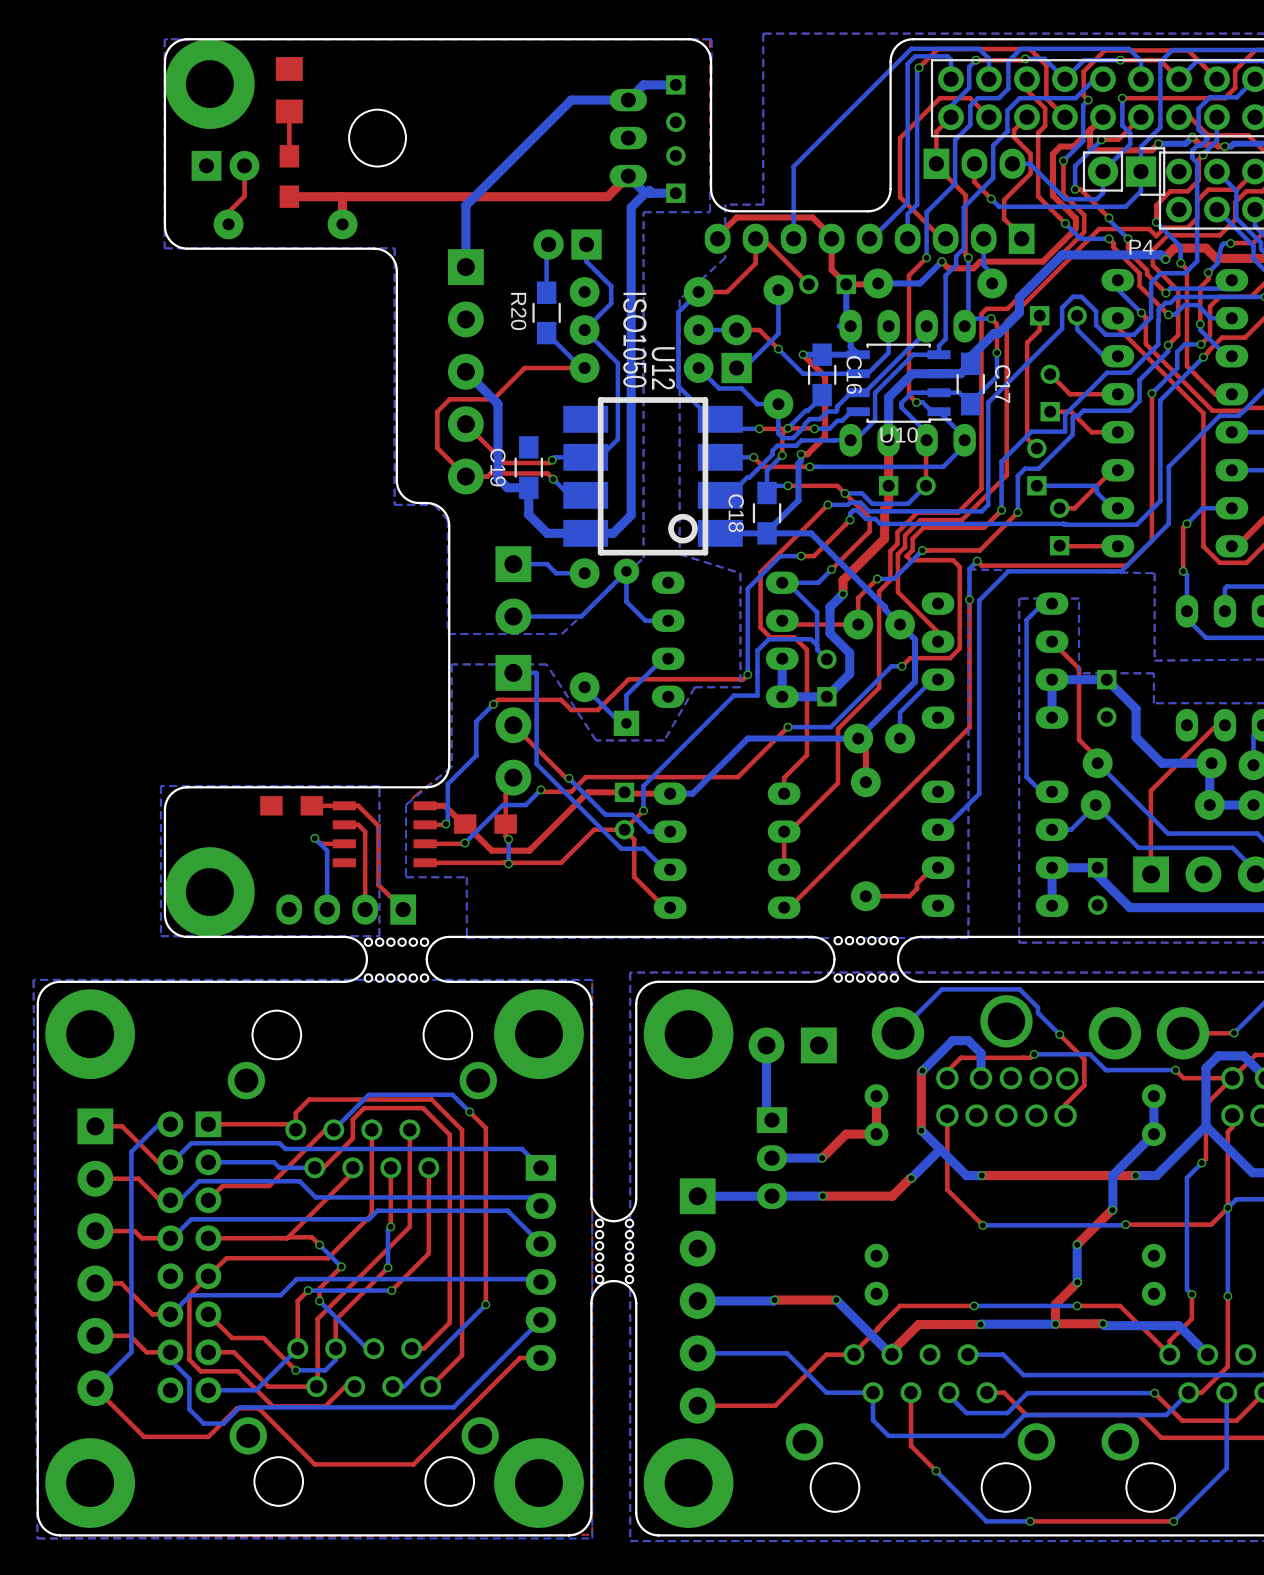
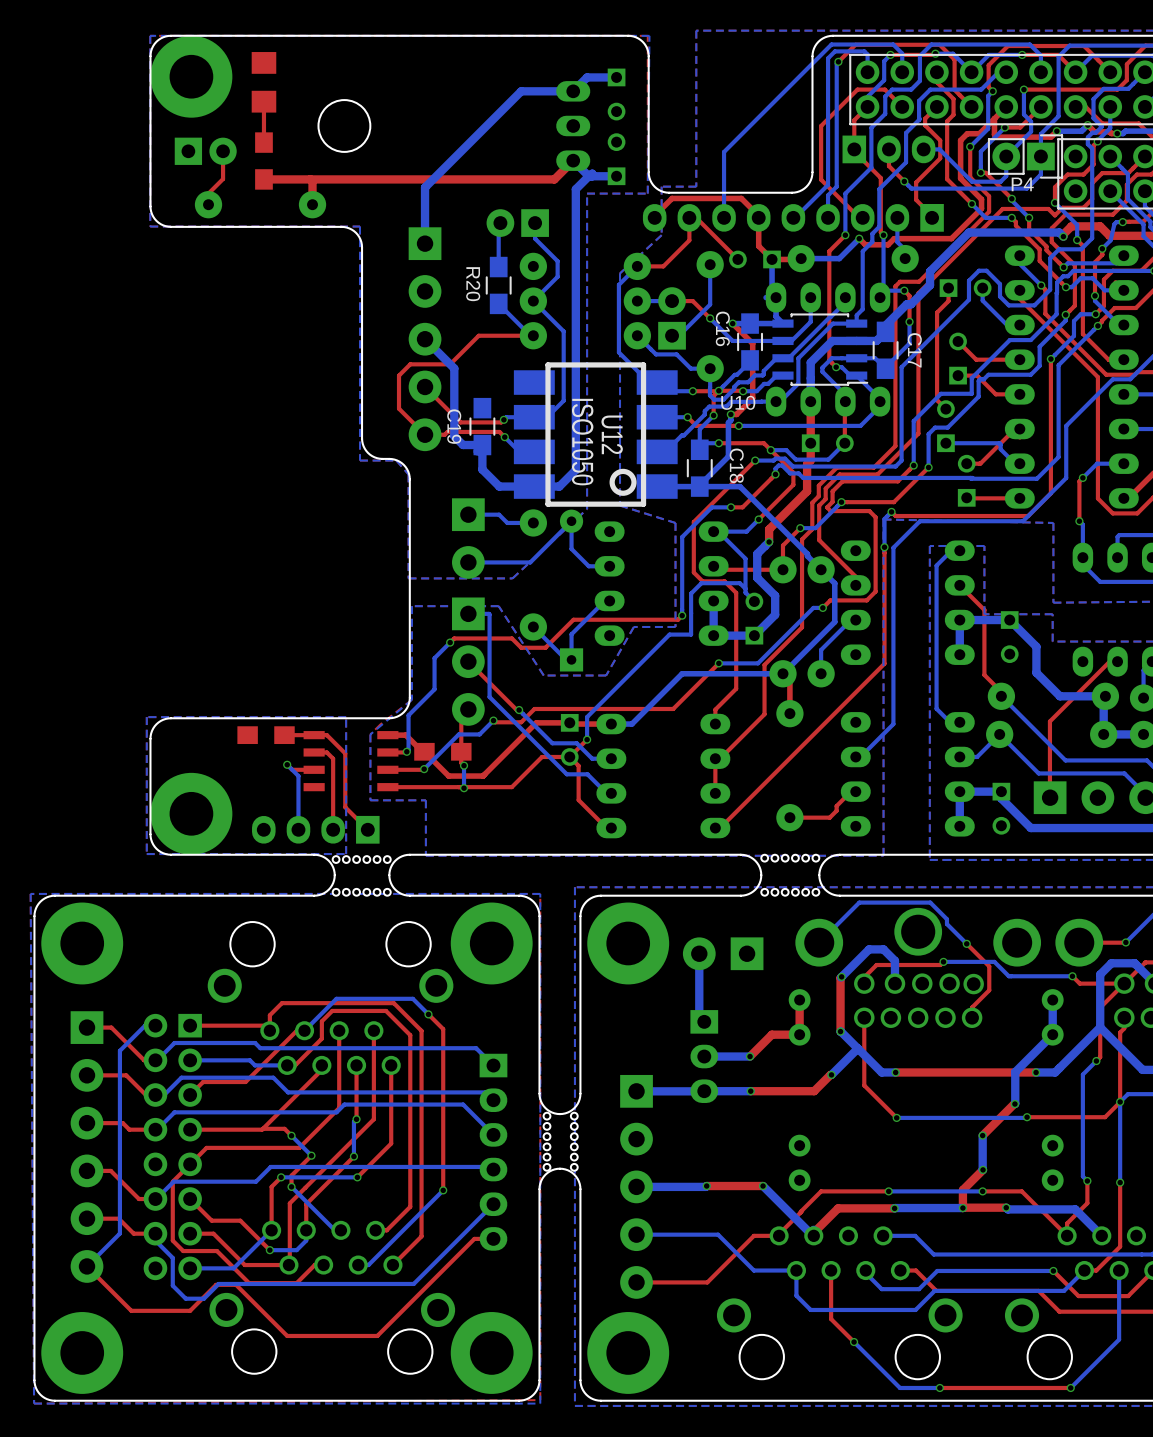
P4 name position: P4 (1141, 247) -> P4 (1022, 184)
U12 value position: ISO1050 (634, 340) -> ISO1050 (582, 442)
U12 name position: U12 (663, 368) -> U12 (612, 434)
C16 name position: C16 (854, 374) -> C16 (722, 328)
U10 name position: U10 (899, 435) -> U10 (738, 402)
C18 name position: C18 (736, 513) -> C18 (736, 465)

